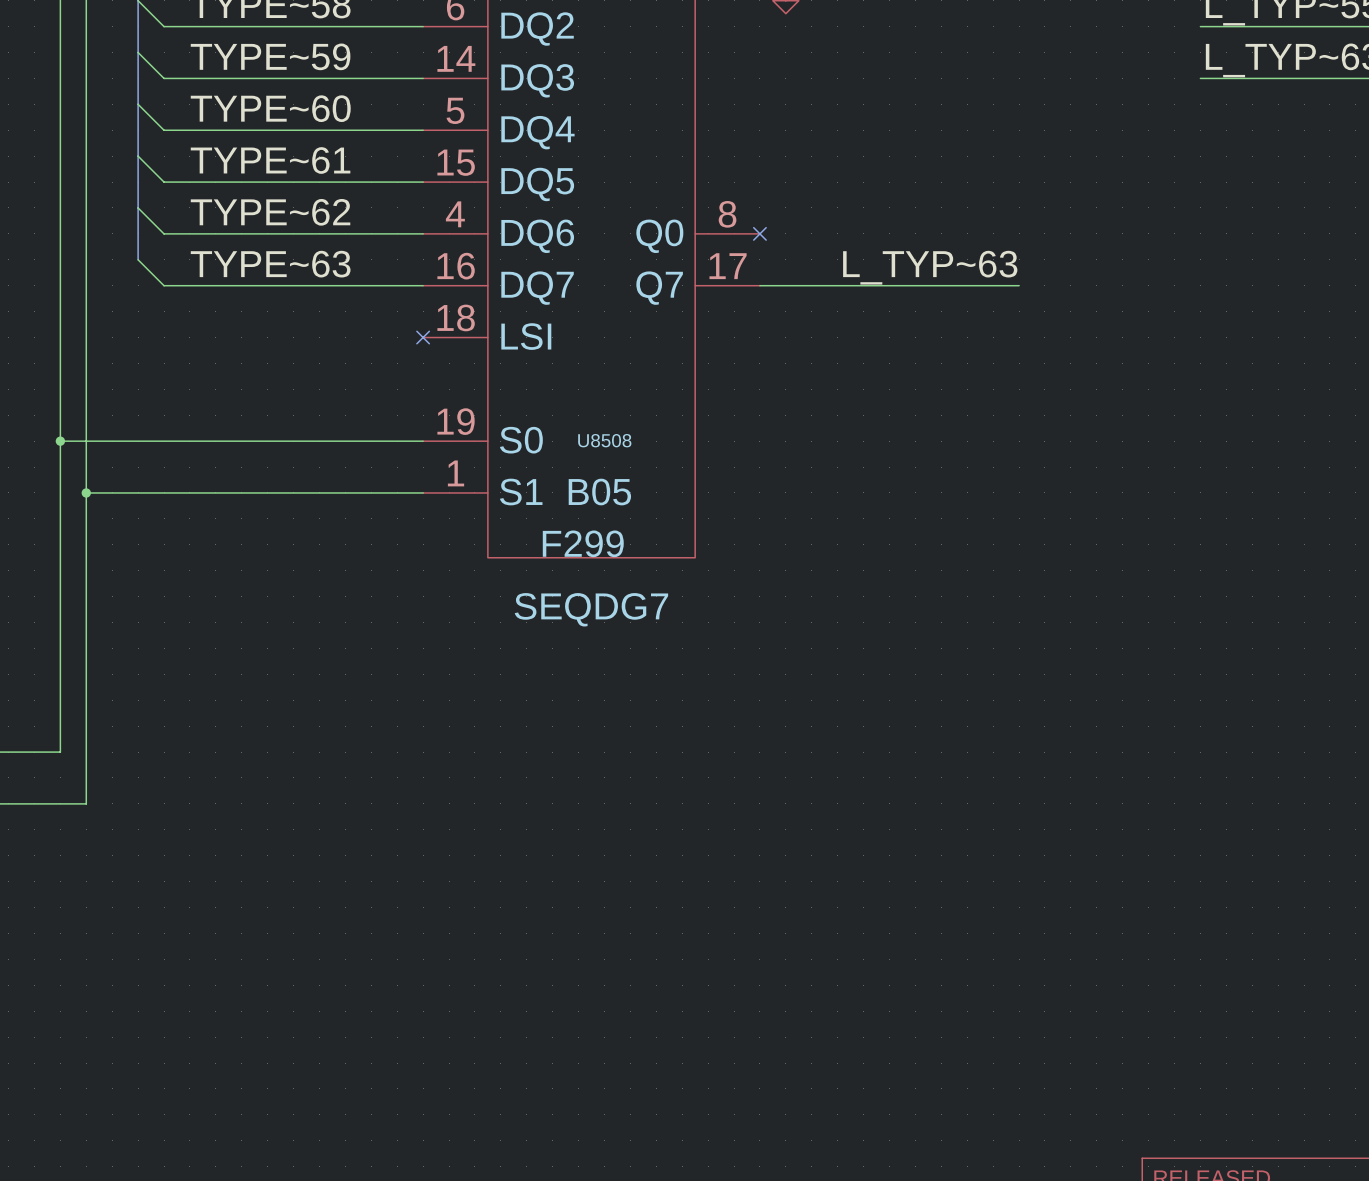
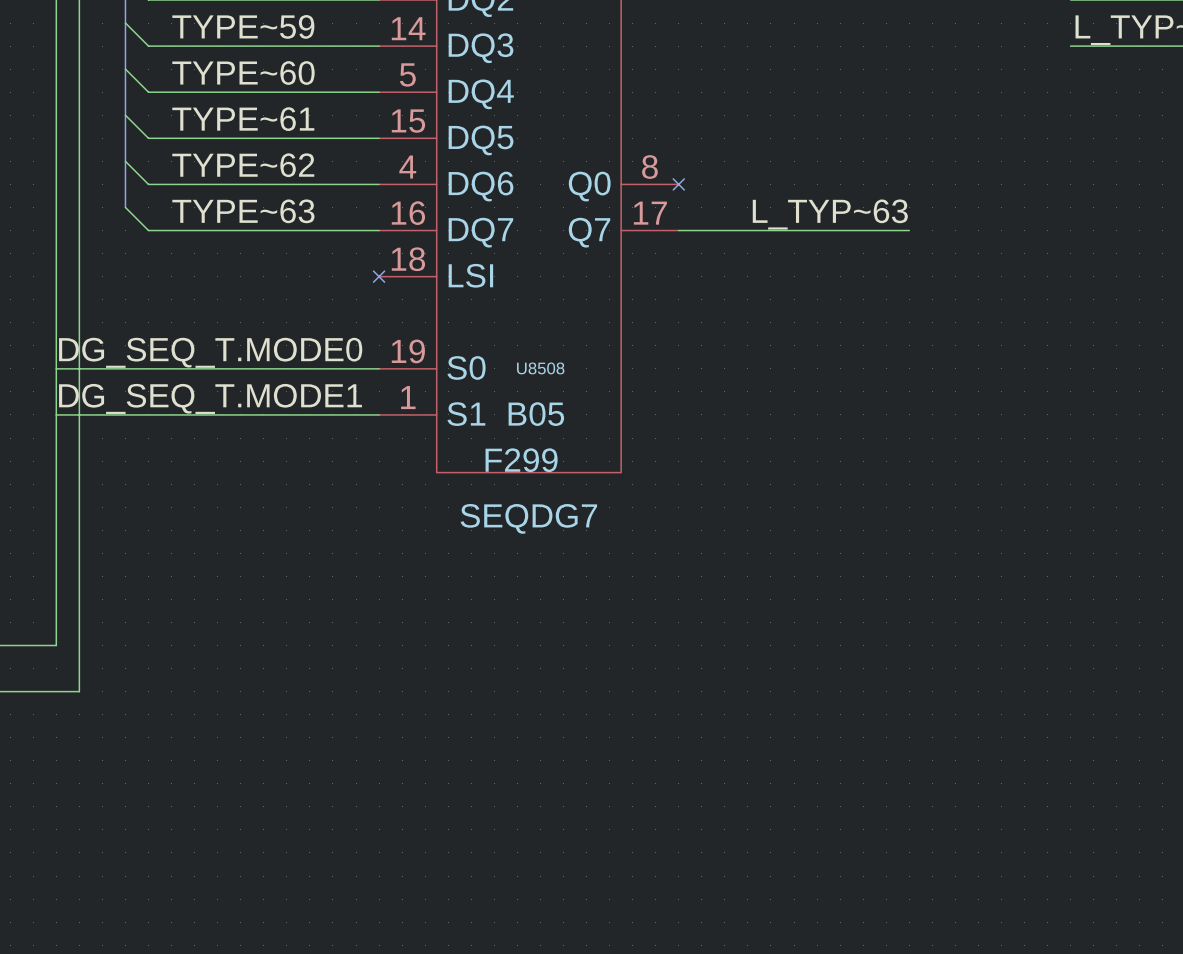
label: none -> DG_SEQ_T.MODE0 (210, 352)
junction: (60, 441) -> none
label: none -> DG_SEQ_T.MODE1 (210, 398)
wire: none -> (56, 414) (79, 414)
junction: (86, 492) -> none

